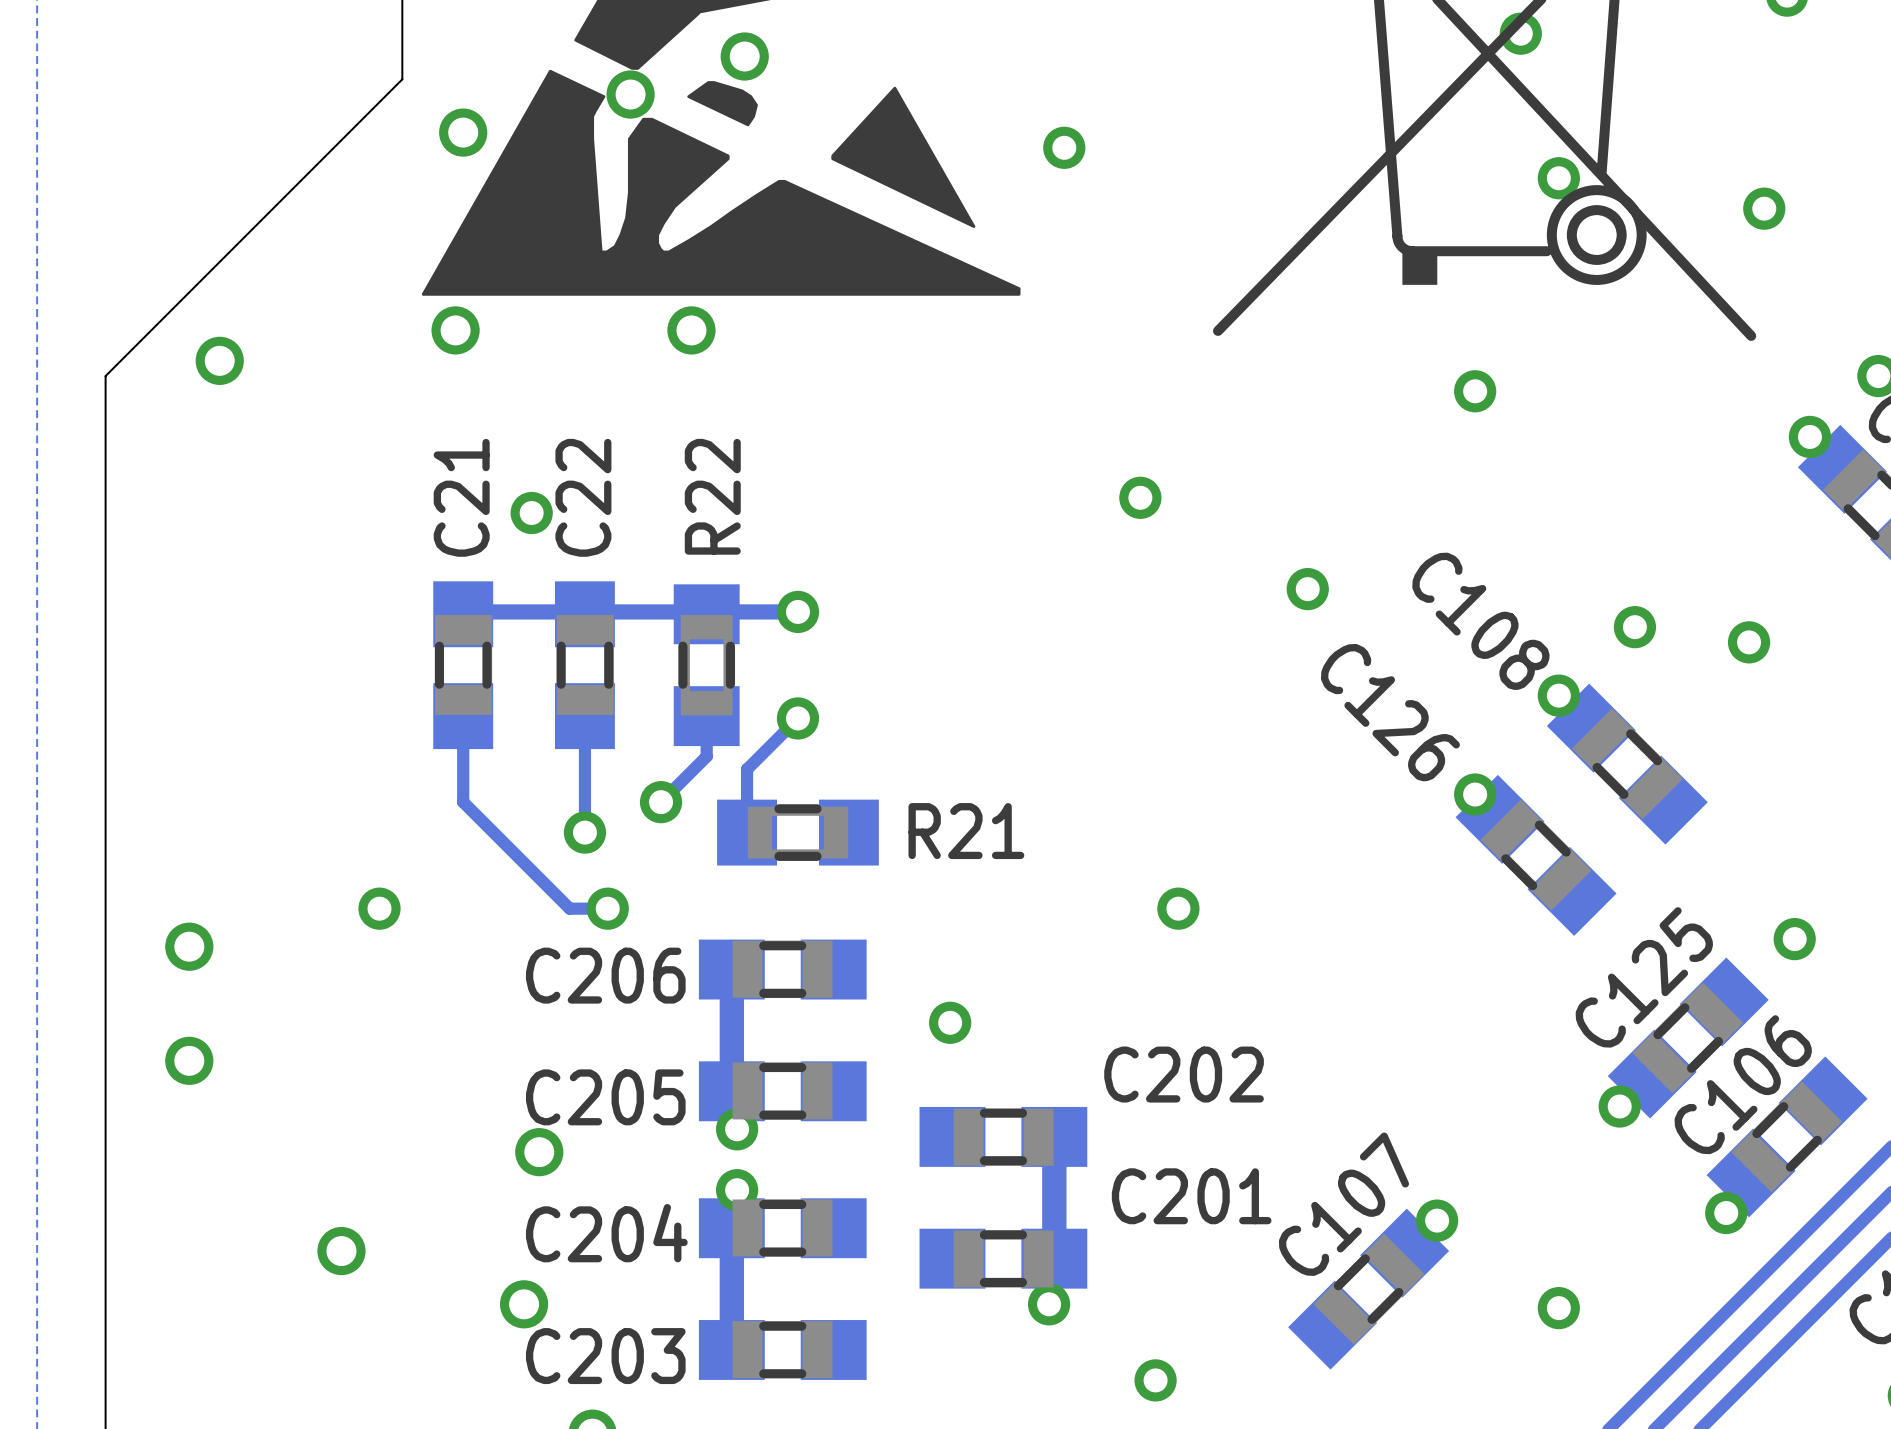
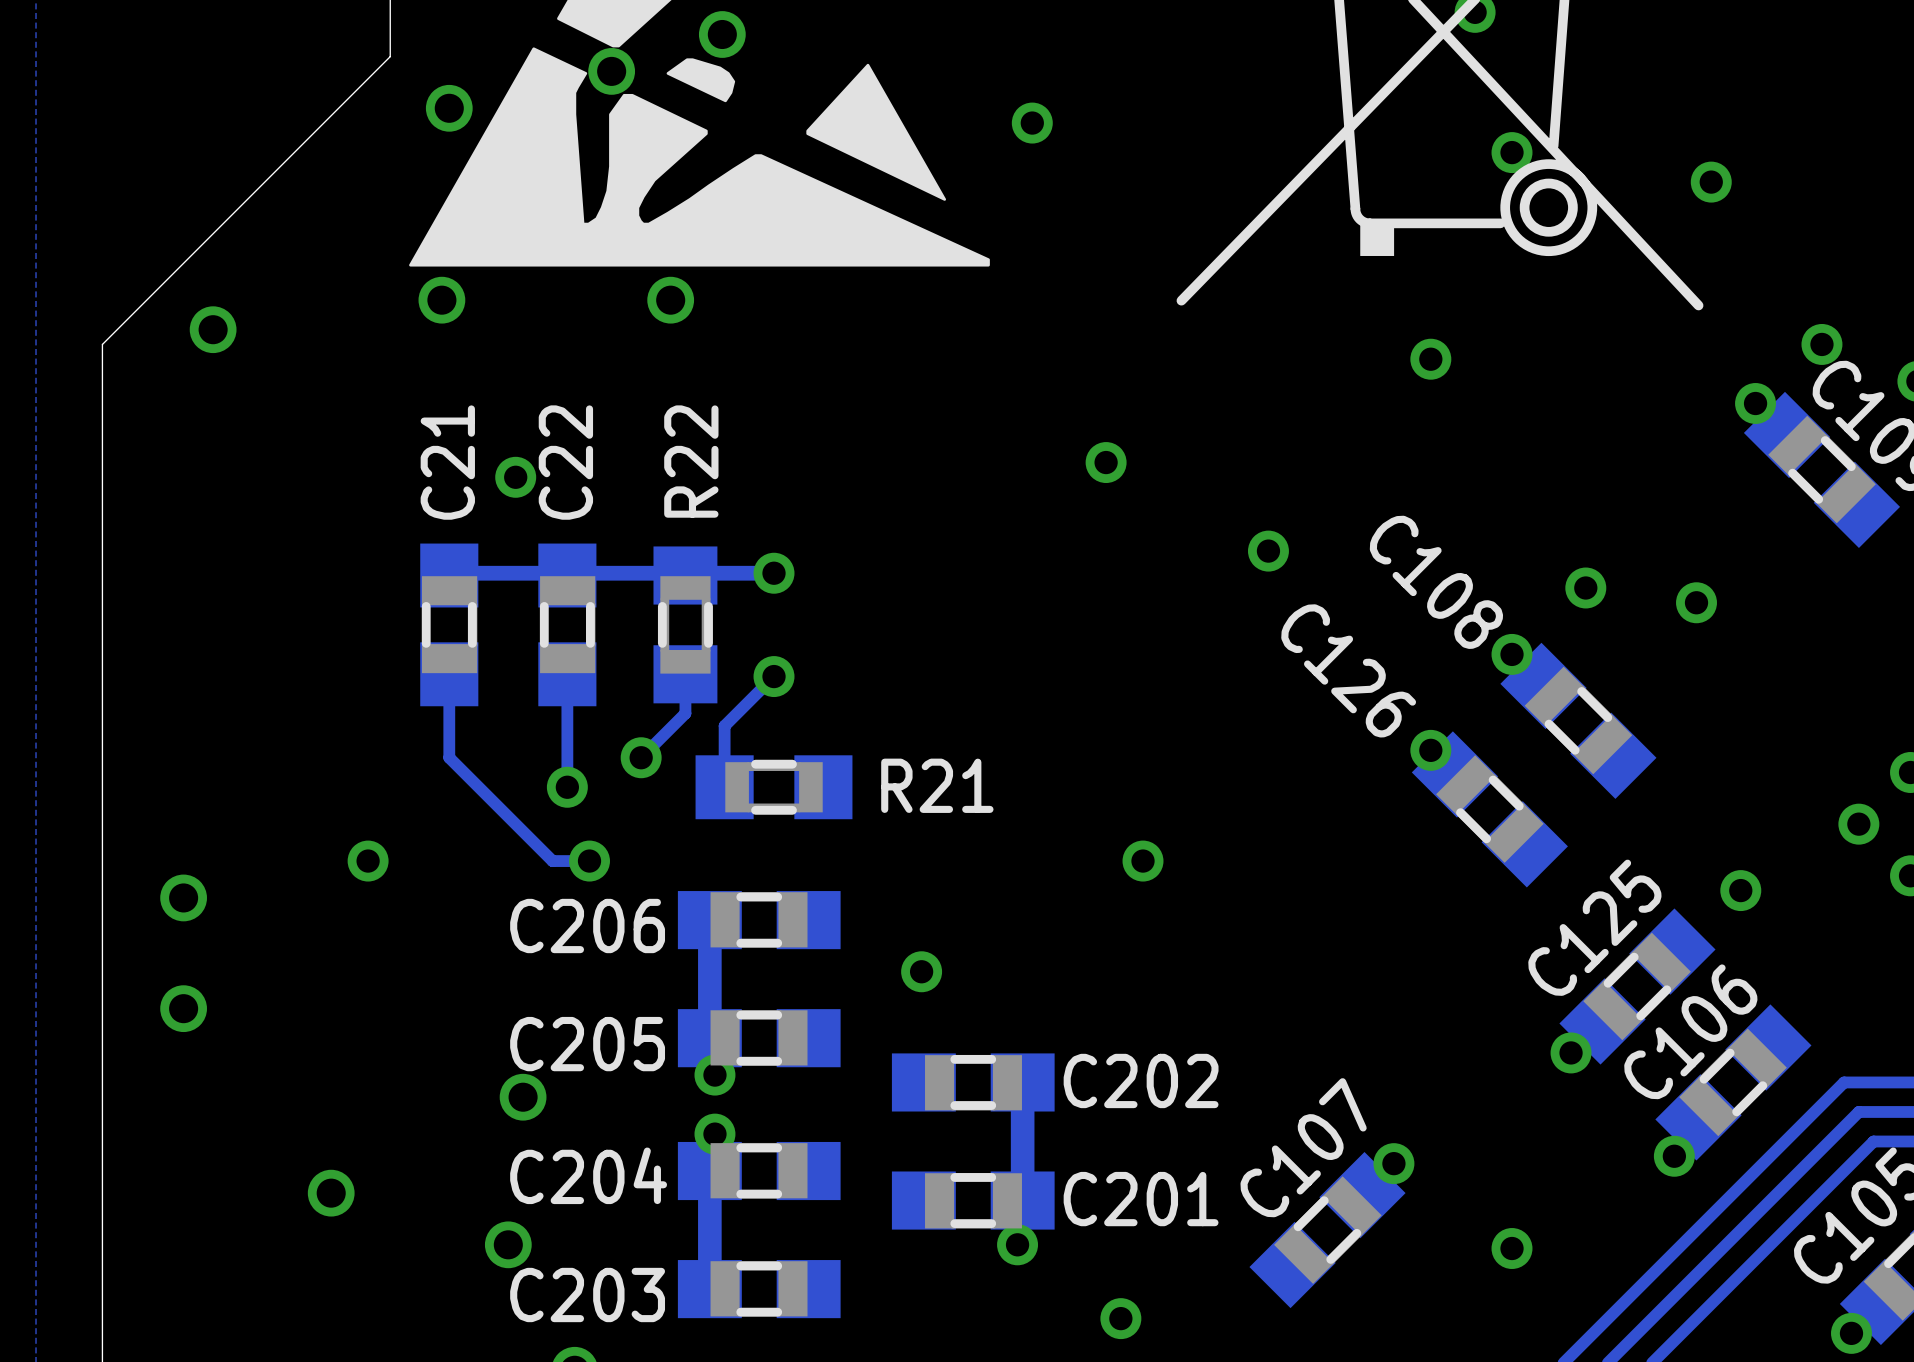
text position: C202 (1184, 1074) -> C202 (1141, 1080)
text position: C201 (1191, 1196) -> C201 (1141, 1199)

